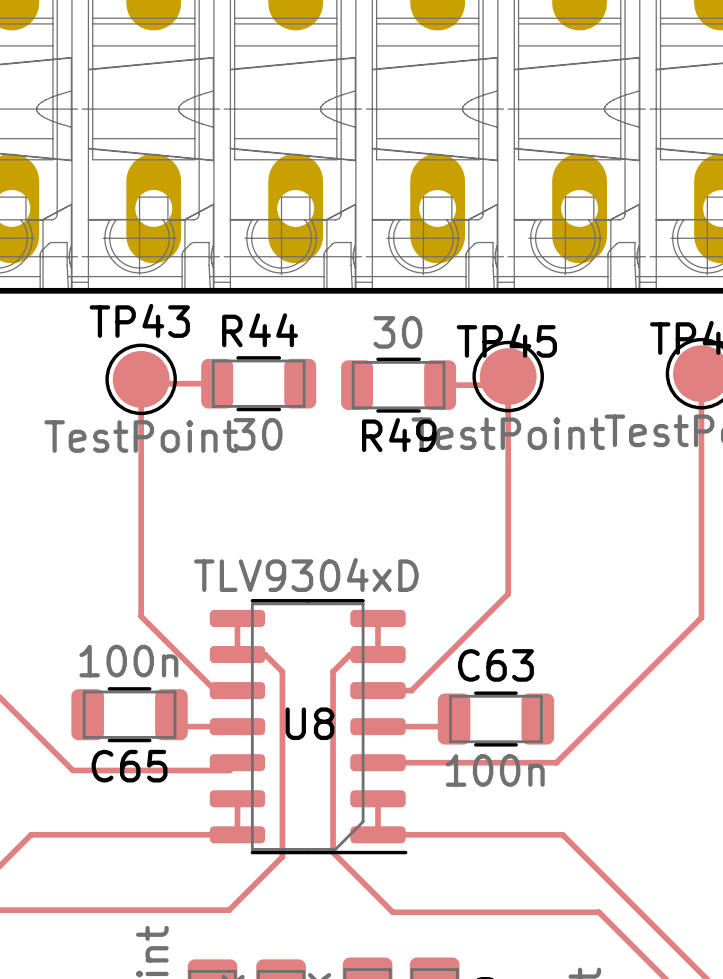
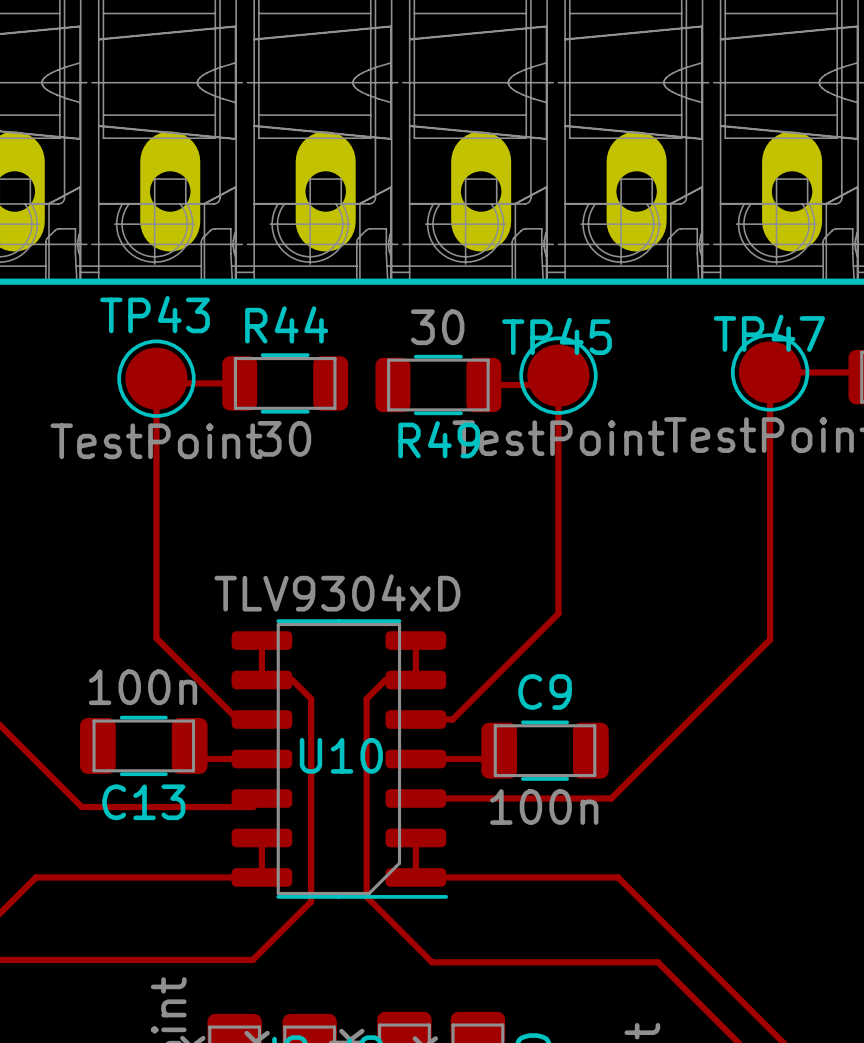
C63 name: C63 (495, 665) -> C9 (545, 691)
U8 name: U8 (309, 723) -> U10 (341, 755)
C65 name: C65 (129, 766) -> C13 (143, 802)

